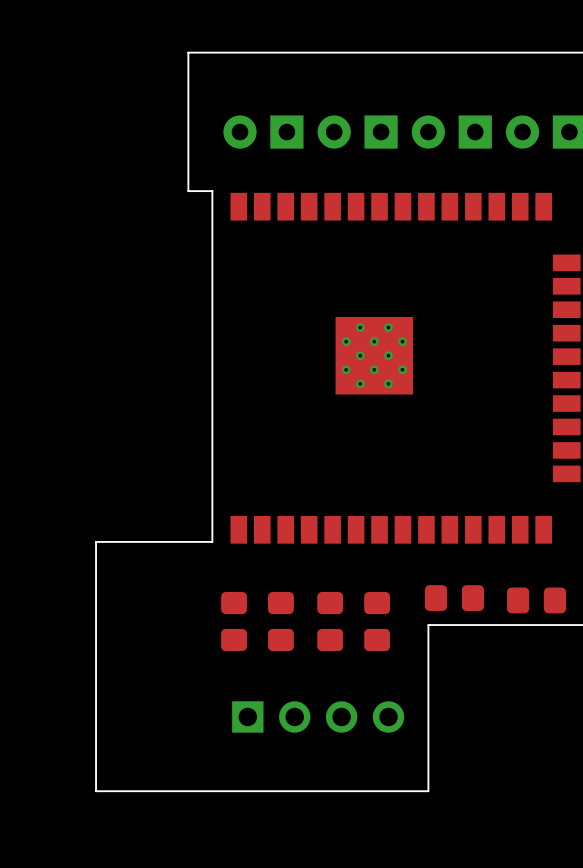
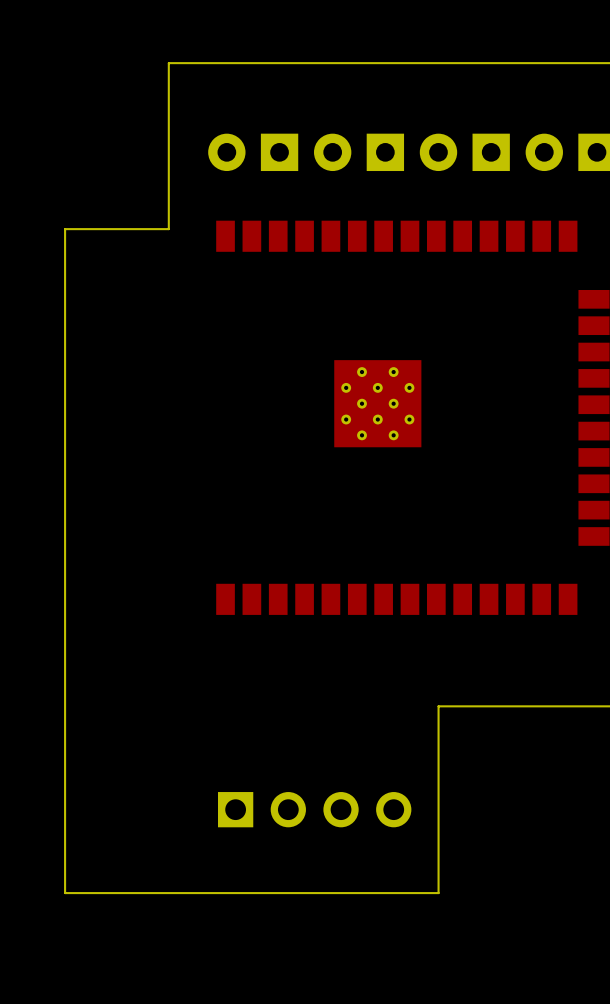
board edge: (188, 191) (212, 191) (212, 541) (96, 541) -> (168, 218) (168, 229) (65, 229) (65, 612)
part: (454, 598) -> none
part: (536, 600) -> none
part: (234, 621) -> none
part: (280, 621) -> none
part: (330, 621) -> none
part: (377, 621) -> none

